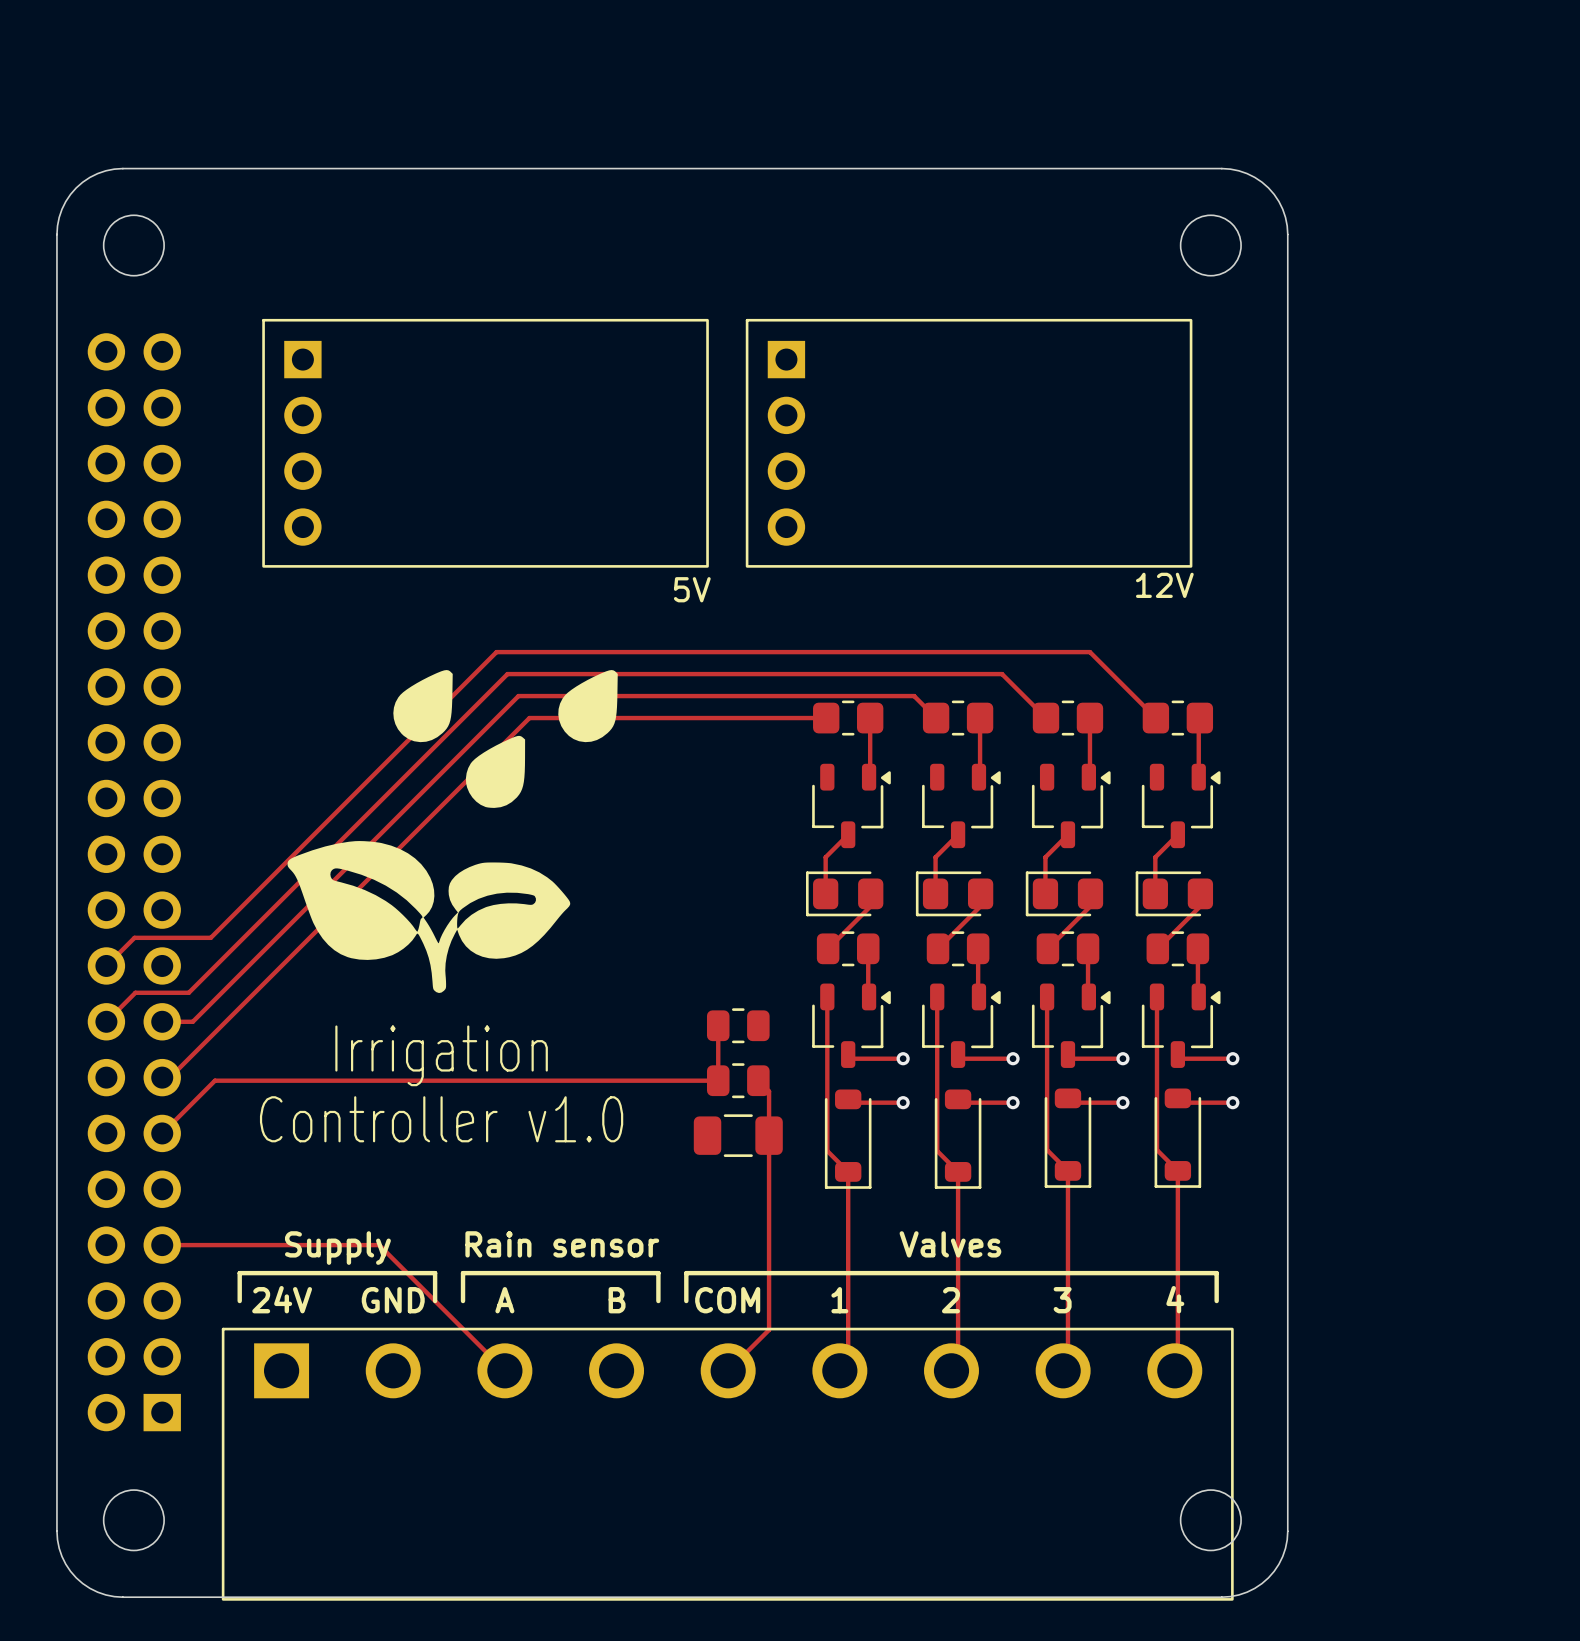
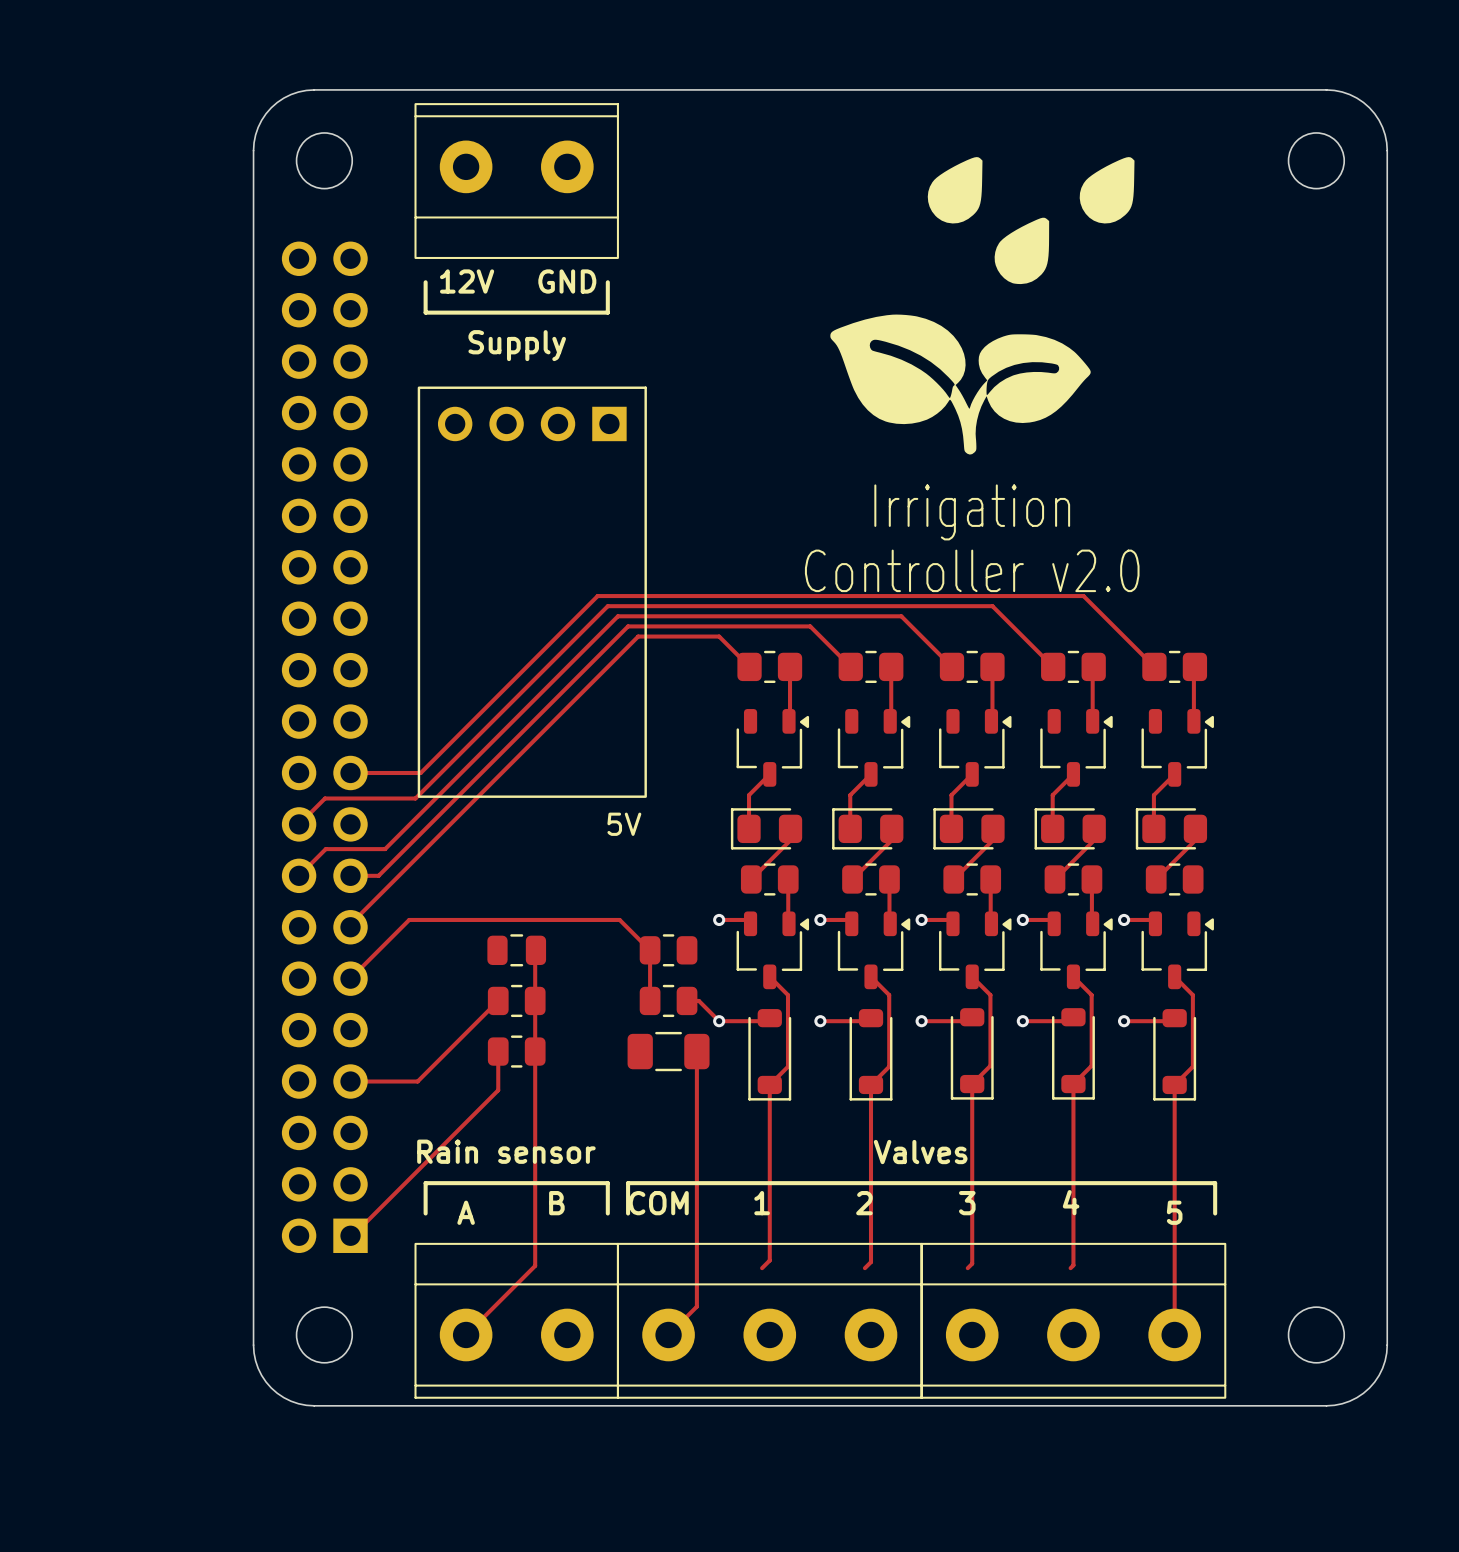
drawing: none -> [830, 157, 1135, 455]
board edge: (122, 168) (1221, 168) (1238, 170) (1254, 177) (1274, 194) (1282, 209) (1287, 234) (1287, 1531) (1285, 1548) (1278, 1564) (1261, 1583) (1238, 1594) (1221, 1597) (122, 1597) (105, 1594) (89, 1588) (70, 1571) (59, 1548) (56, 1531) (56, 234) (61, 209) (76, 187) (97, 173) (122, 168) -> (314, 89) (1326, 89) (1342, 92) (1356, 98) (1374, 113) (1385, 134) (1387, 150) (1387, 1345) (1385, 1360) (1379, 1375) (1363, 1393) (1342, 1403) (1326, 1405) (314, 1405) (298, 1403) (283, 1397) (266, 1382) (255, 1360) (253, 1345) (253, 150) (258, 127) (271, 107) (291, 94) (314, 89)
part: none -> (516, 181)
round board edge position: (133, 245) -> (324, 160)
round board edge position: (1210, 245) -> (1316, 160)
text: none -> 12V (467, 281)
text: none -> GND (567, 281)
line: none -> (425, 282) (425, 312) (607, 312) (607, 282)
text: none -> Supply (517, 345)
part rotation: 0° (485, 443) -> 90° clockwise (532, 592)
part: 12V (969, 443) -> none
text: none -> Irrigation (972, 512)
part value position: 5V (692, 589) -> 5V (624, 824)
text: none -> Controller v2.0 (972, 570)
track: (672, 652) (496, 652) (210, 937) (134, 937) (106, 965) -> (607, 606) (415, 798) (325, 798) (299, 824)
drawing: [287, 670, 618, 994] -> none
track: (694, 674) (507, 674) (188, 992) (135, 992) (106, 1021) -> (628, 626) (378, 875) (350, 875)
track: (892, 674) (1002, 674) -> (810, 626) (830, 646)
track: none -> (911, 626) (901, 616) (617, 616) (385, 849) (325, 849) (299, 875)
track: (914, 696) (518, 696) (192, 1021) (162, 1021) -> none
track: (826, 718) (529, 718) (169, 1077) (162, 1077) -> (749, 666) (719, 636) (638, 636) (350, 924) (350, 927)
track: none -> (1154, 666) (1083, 596) (597, 596) (420, 772) (350, 772)
part: none -> (1174, 666)
track: none -> (1194, 666) (1193, 721)
part: none -> (1177, 747)
track: none -> (1174, 774) (1153, 795) (1153, 828)
part position: (134, 882) -> (324, 747)
part: none -> (1171, 828)
track: none -> (1195, 828) (1195, 840) (1156, 879)
part: none -> (1174, 879)
track: none -> (719, 919) (746, 919) (750, 923)
via: none -> (719, 919)
track: none -> (820, 919) (847, 919) (851, 923)
via: none -> (820, 919)
track: none -> (921, 919) (949, 919) (952, 923)
via: none -> (921, 919)
track: none -> (1022, 919) (1050, 919) (1054, 923)
via: none -> (1022, 919)
track: none -> (1124, 919) (1151, 919) (1155, 923)
via: none -> (1124, 919)
track: (827, 996) (827, 1151) (848, 1171) -> (773, 980) (788, 995) (788, 1066) (769, 1084)
track: (937, 996) (937, 1151) (958, 1171) -> (874, 980) (889, 995) (889, 1066) (871, 1084)
track: (1047, 996) (1047, 1150) (1067, 1170) -> (976, 980) (990, 995) (990, 1065) (972, 1084)
track: (1156, 996) (1156, 1150) (1177, 1170) -> (1077, 980) (1091, 995) (1091, 1065) (1073, 1084)
part: none -> (516, 950)
track: none -> (535, 950) (535, 1265) (466, 1334)
track: none -> (650, 950) (619, 919) (409, 919) (350, 978)
part: none -> (1177, 950)
track: none -> (1174, 976) (1192, 995) (1192, 1066) (1174, 1084) (1174, 1334)
text: Irrigation (441, 1055) -> none
track: (852, 1058) (903, 1058) -> none
via: (903, 1058) -> none
track: (962, 1058) (1013, 1058) -> none
via: (1013, 1058) -> none
track: (1072, 1058) (1122, 1058) -> none
via: (1122, 1058) -> none
track: (1182, 1058) (1232, 1058) -> none
via: (1232, 1058) -> none
track: none -> (498, 1000) (417, 1081) (350, 1081)
part: none -> (516, 1000)
track: (718, 1080) (214, 1080) (162, 1133) -> none
track: (758, 1080) (769, 1091) (769, 1126) -> (687, 1000) (698, 1000) (719, 1021) (766, 1021) (769, 1018)
via: none -> (719, 1021)
track: (851, 1102) (903, 1102) -> (871, 1018) (867, 1021) (820, 1021)
track: (961, 1102) (1013, 1102) -> (972, 1017) (968, 1021) (921, 1021)
track: (1072, 1102) (1122, 1102) -> (1073, 1017) (1069, 1021) (1022, 1021)
track: (1182, 1102) (1232, 1102) -> (1174, 1018) (1171, 1021) (1124, 1021)
text: Controller v1.0 (441, 1119) -> none
track: none -> (498, 1051) (498, 1090) (352, 1235) (350, 1235)
part: none -> (516, 1051)
part: none -> (1174, 1054)
text position: Valves (950, 1244) -> Valves (920, 1152)
track: (162, 1245) (379, 1245) (504, 1370) -> none
text: Supply (337, 1248) -> none
text: 24V (282, 1299) -> none
text: GND (393, 1300) -> none
text position: A (504, 1300) -> A (466, 1212)
line: (239, 1301) (239, 1273) (435, 1273) (435, 1301) -> none
line: (463, 1301) (463, 1273) (658, 1273) (658, 1301) -> none
line: (686, 1301) (686, 1273) (1216, 1273) (1216, 1301) -> none
text: none -> 5 (1174, 1212)
line: none -> (425, 1213) (425, 1183) (607, 1183) (607, 1213)
line: none -> (628, 1213) (628, 1183) (1215, 1183) (1215, 1213)
track: (769, 1329) (728, 1370) -> (696, 1230) (696, 1306) (668, 1334)
part: none -> (516, 1320)
part: none -> (769, 1320)
part: none -> (1073, 1320)
part: (727, 1464) -> none
round board edge position: (133, 1520) -> (324, 1334)
round board edge position: (1210, 1520) -> (1316, 1334)

